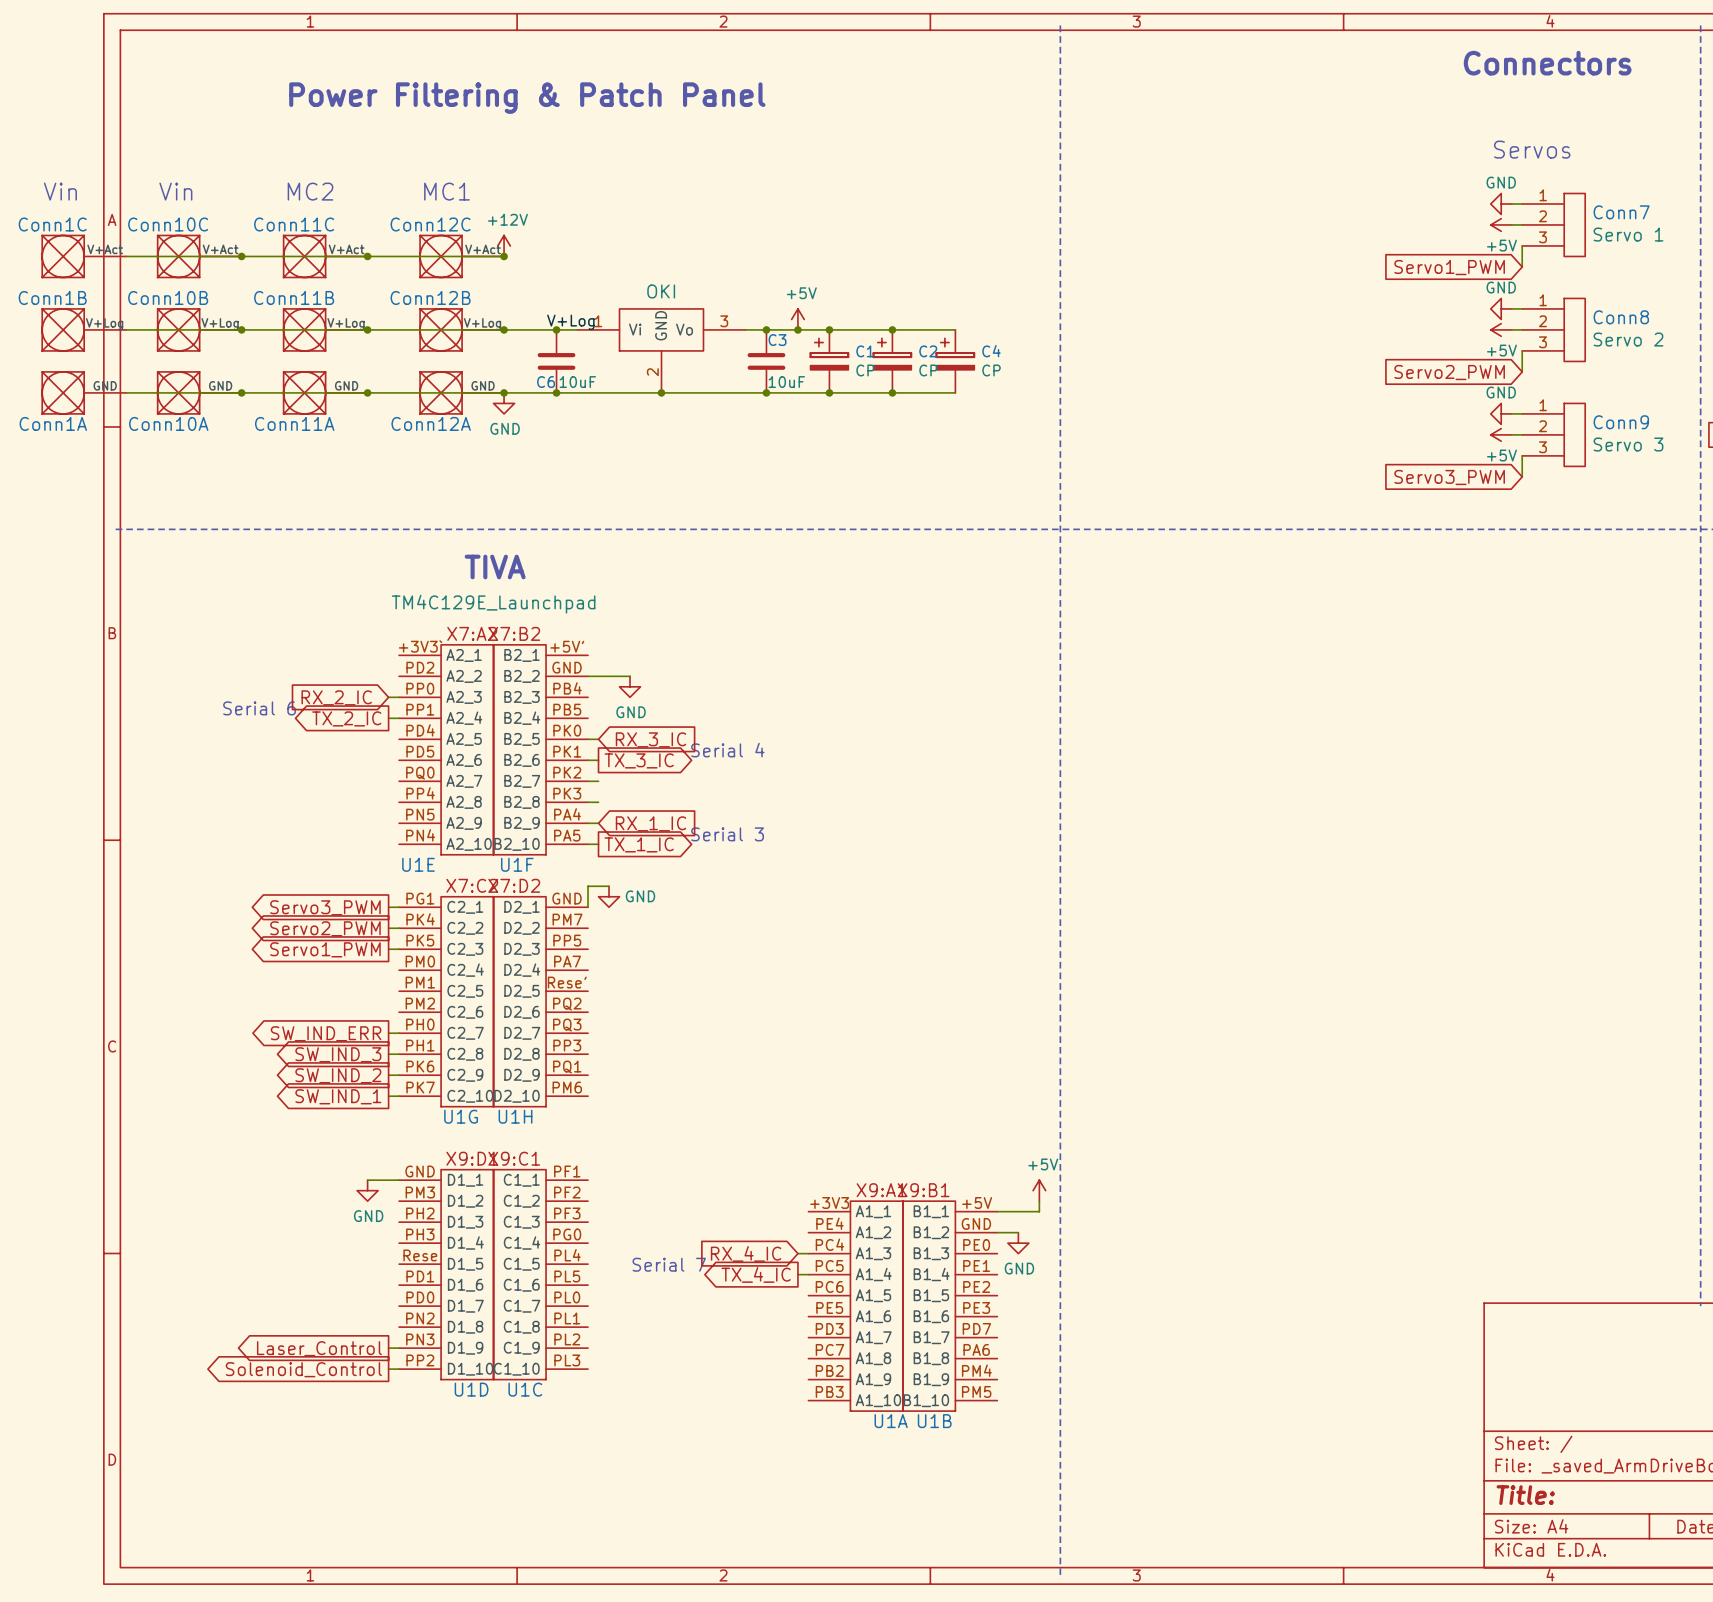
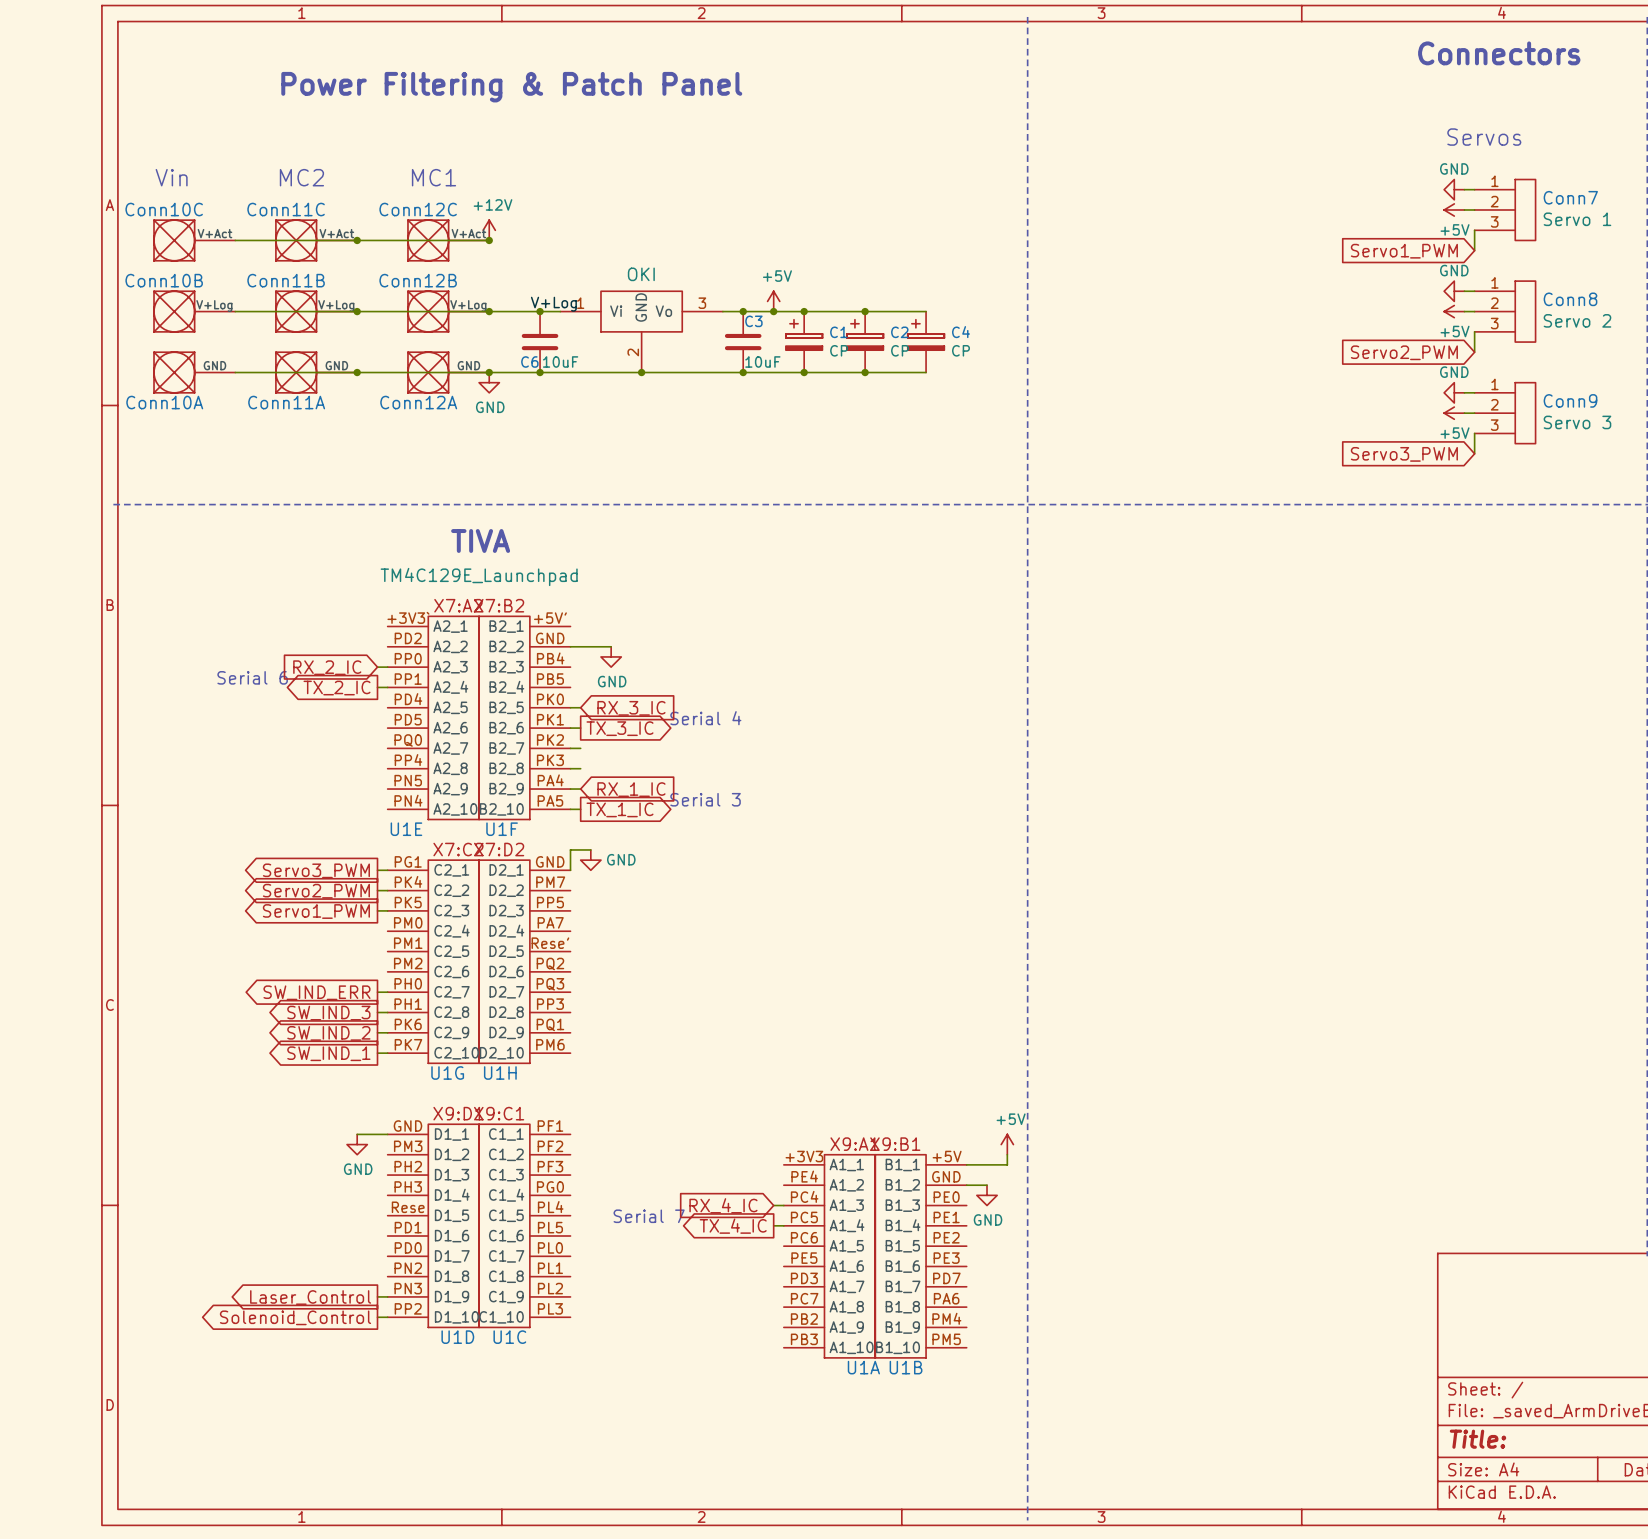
text: Vin (60, 191) -> none
Conn1C: (84, 256) -> none
wire: (126, 256) (241, 256) -> none
junction: (241, 256) -> none
Conn1B: (84, 329) -> none
wire: (126, 329) (241, 329) -> none
junction: (241, 329) -> none
Conn1A: (84, 392) -> none
wire: (126, 392) (241, 392) -> none
junction: (241, 392) -> none

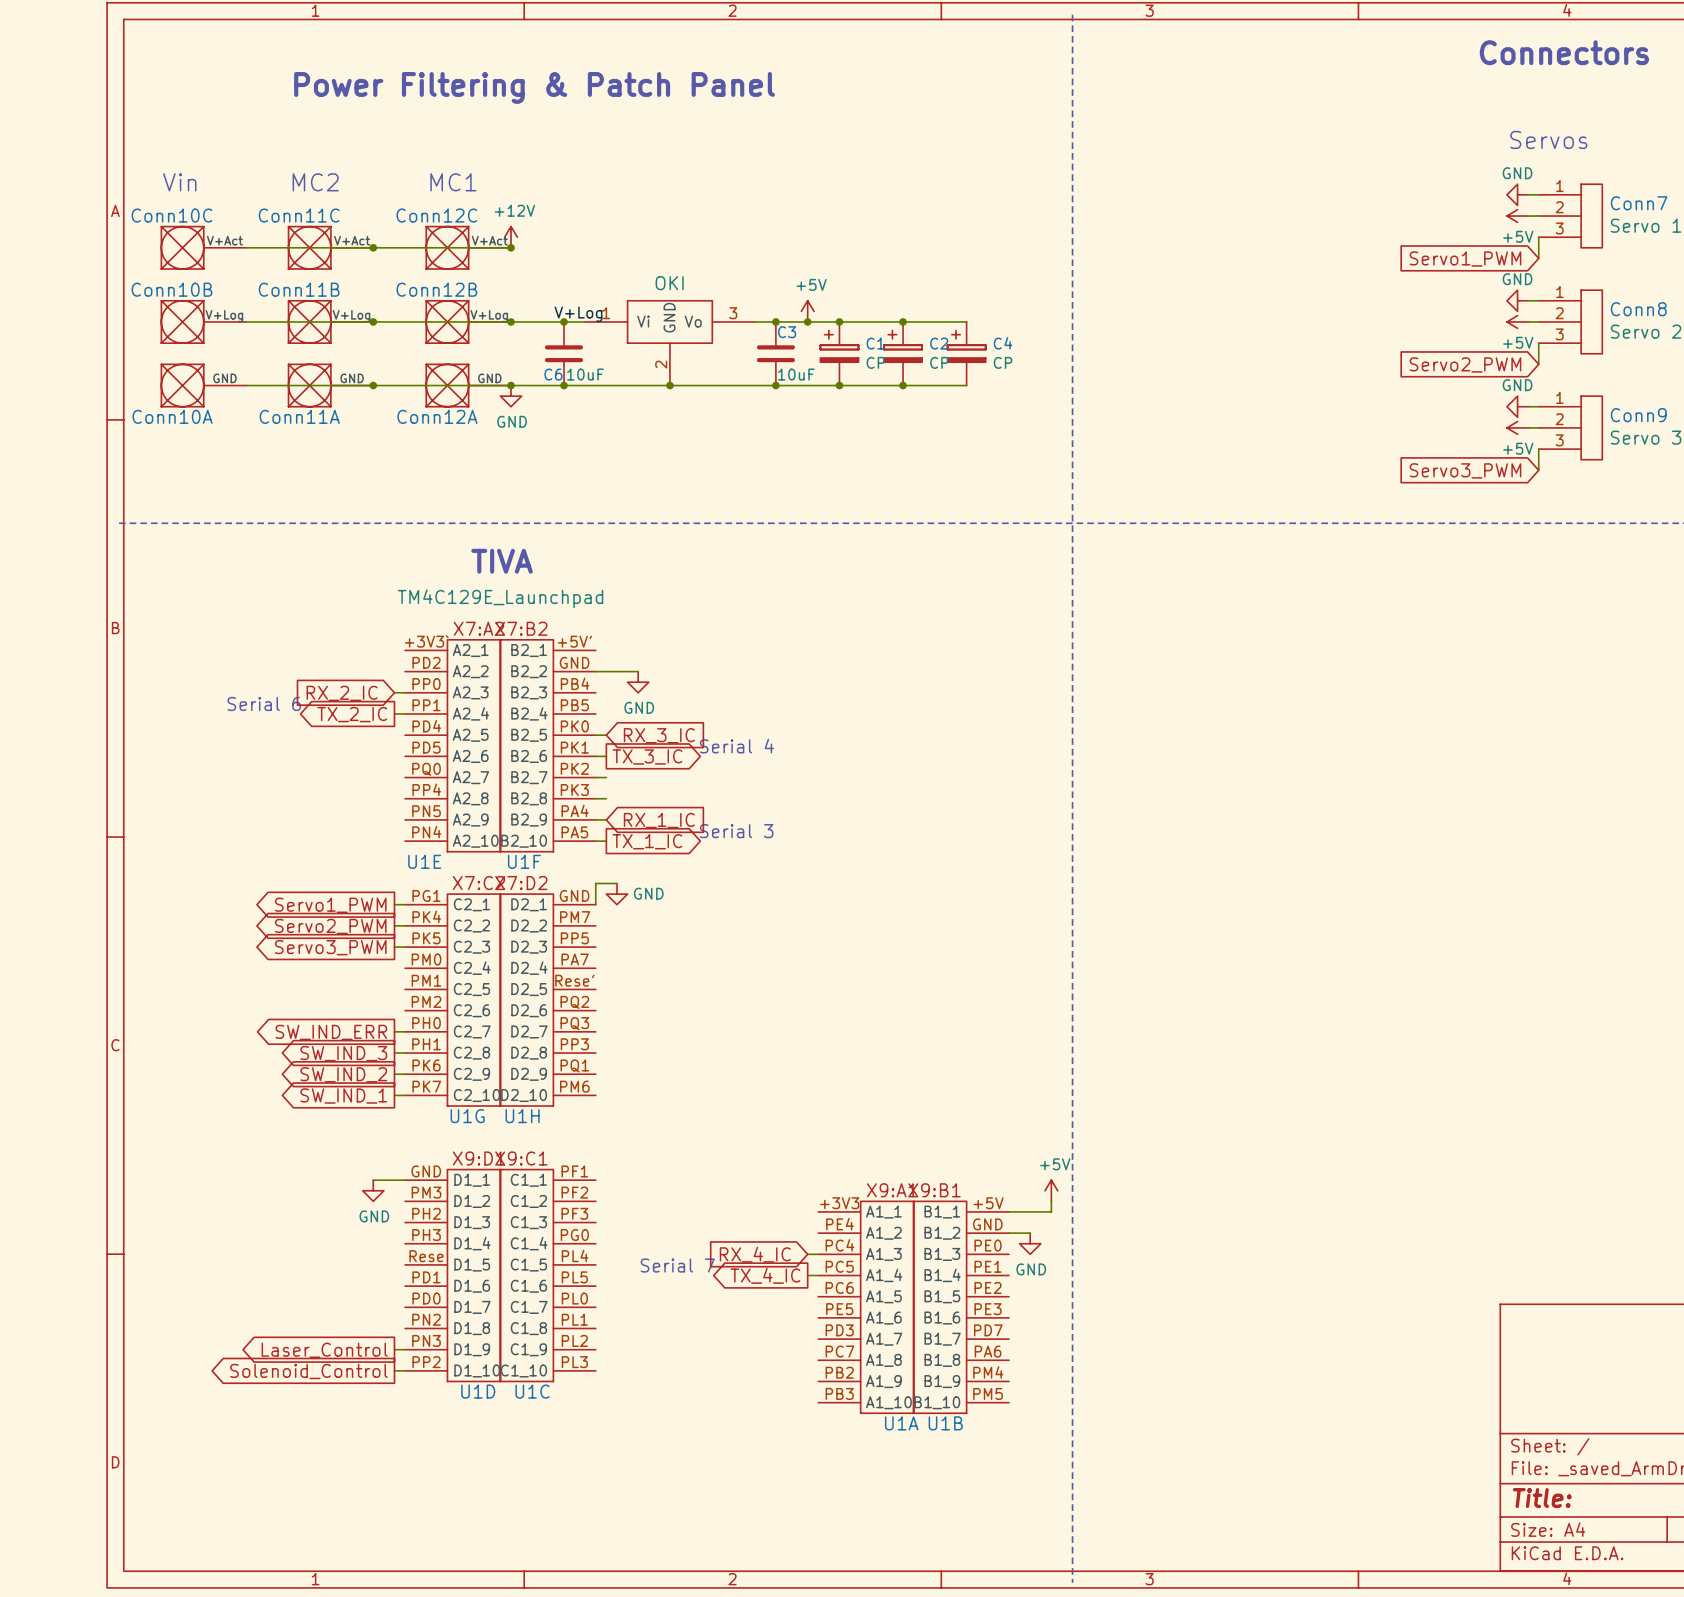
global label: Servo3_PWM (316, 870) -> Servo1_PWM (330, 905)
global label: Servo1_PWM (316, 911) -> Servo3_PWM (330, 947)

